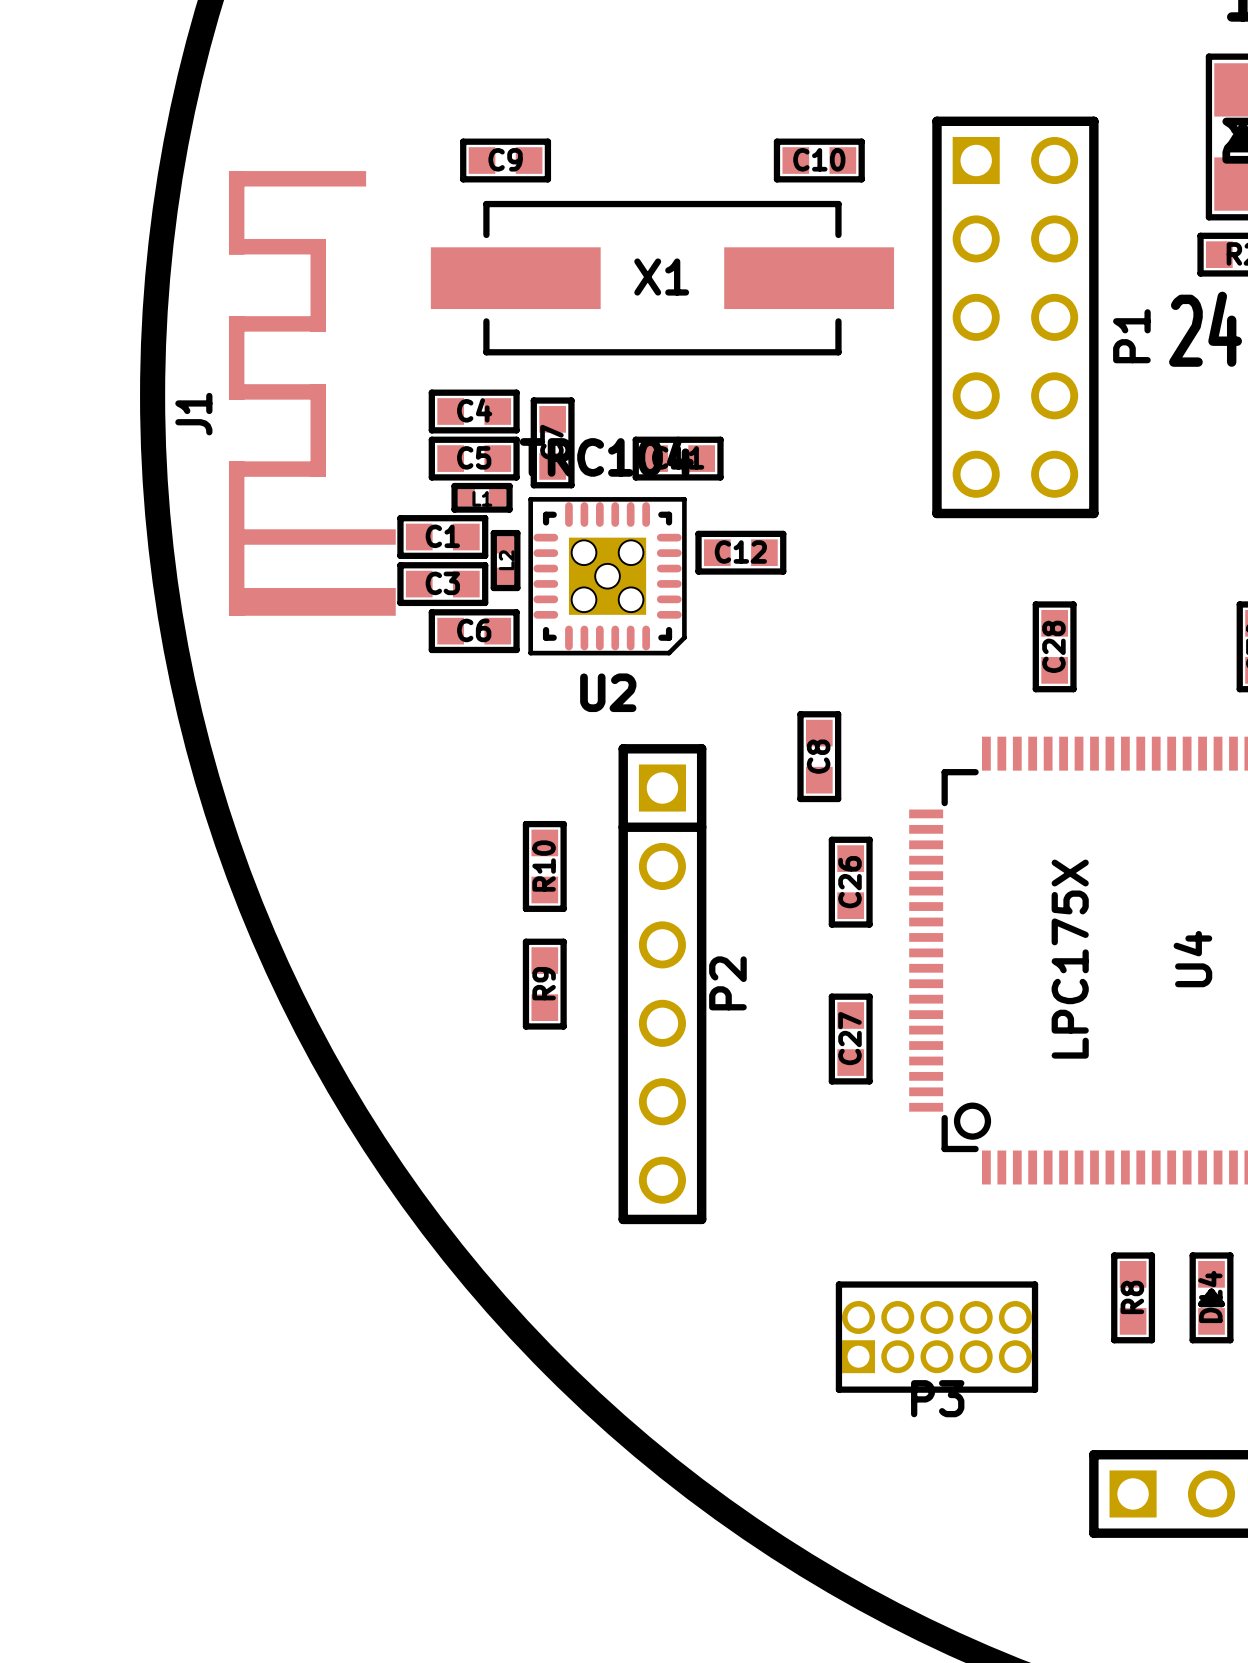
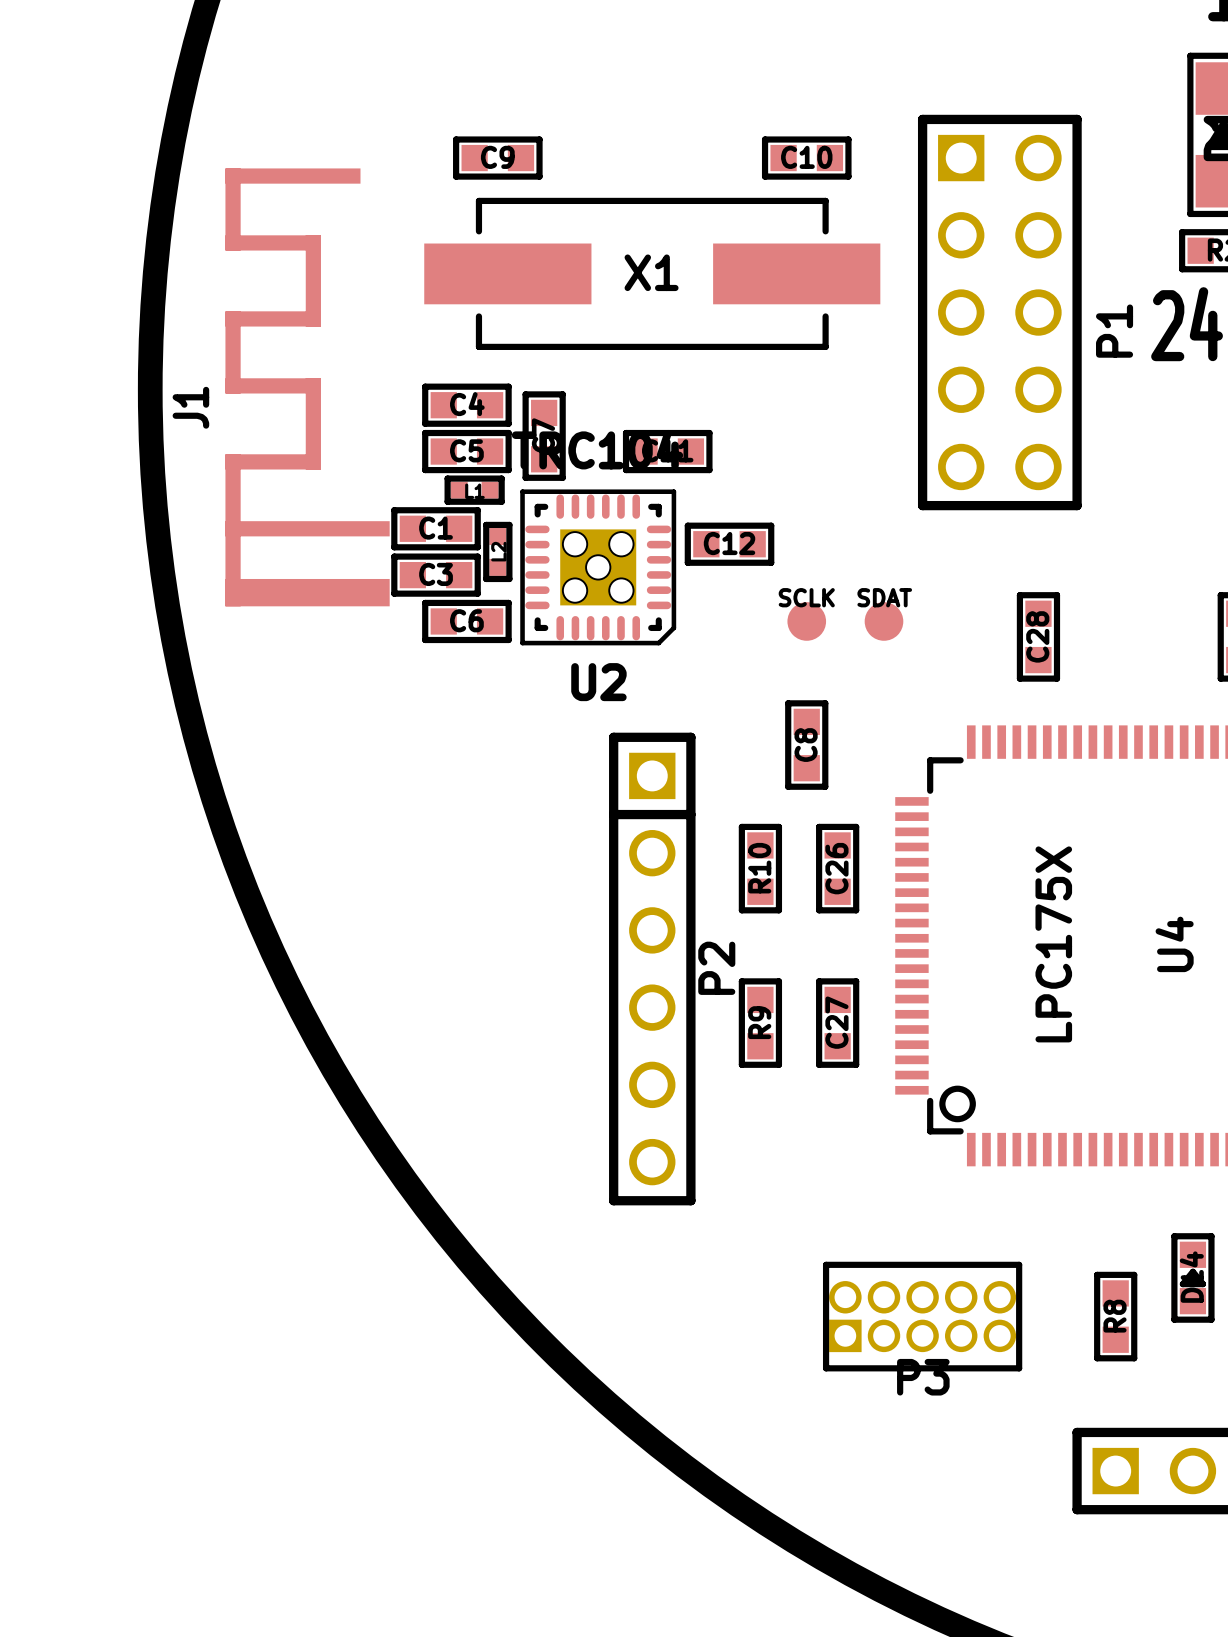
part: none -> SCLK (806, 621)
part: none -> SDAT (883, 621)
R10 position: (544, 866) -> (760, 868)
R9 position: (544, 984) -> (760, 1023)
R8 position: (1133, 1297) -> (1115, 1316)

